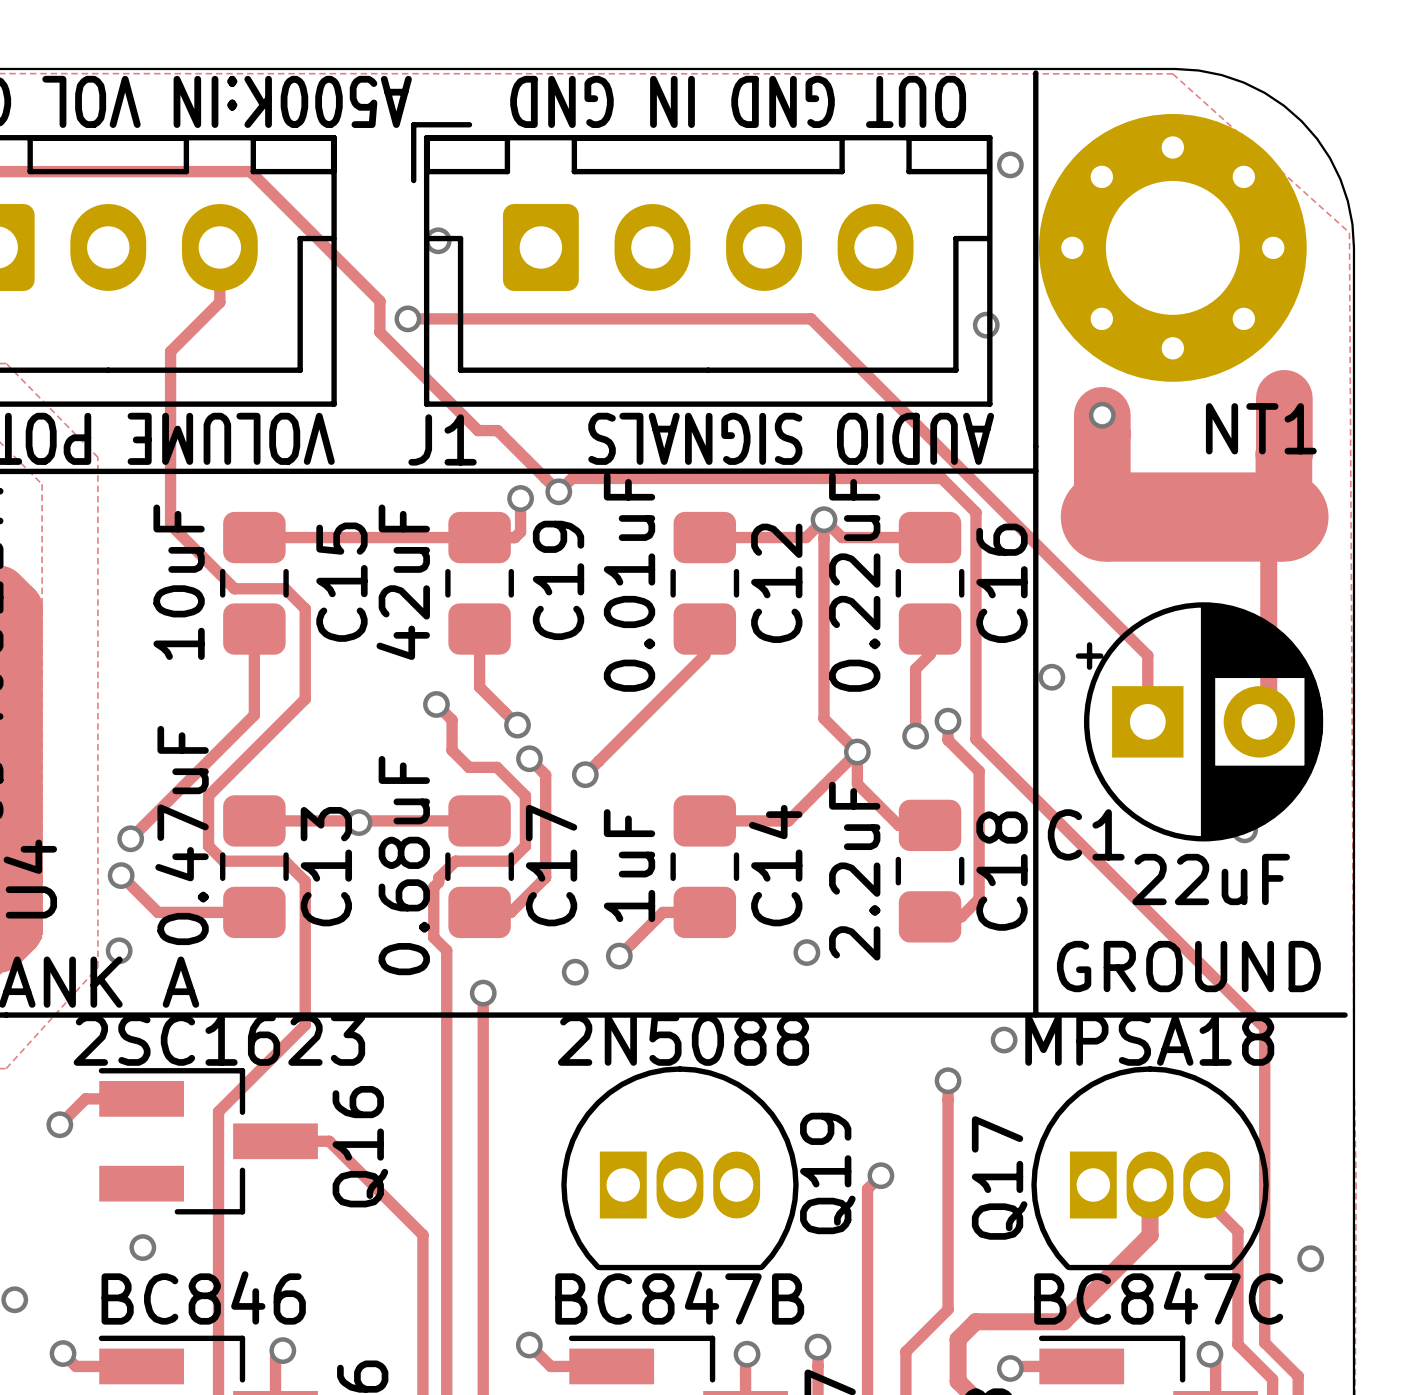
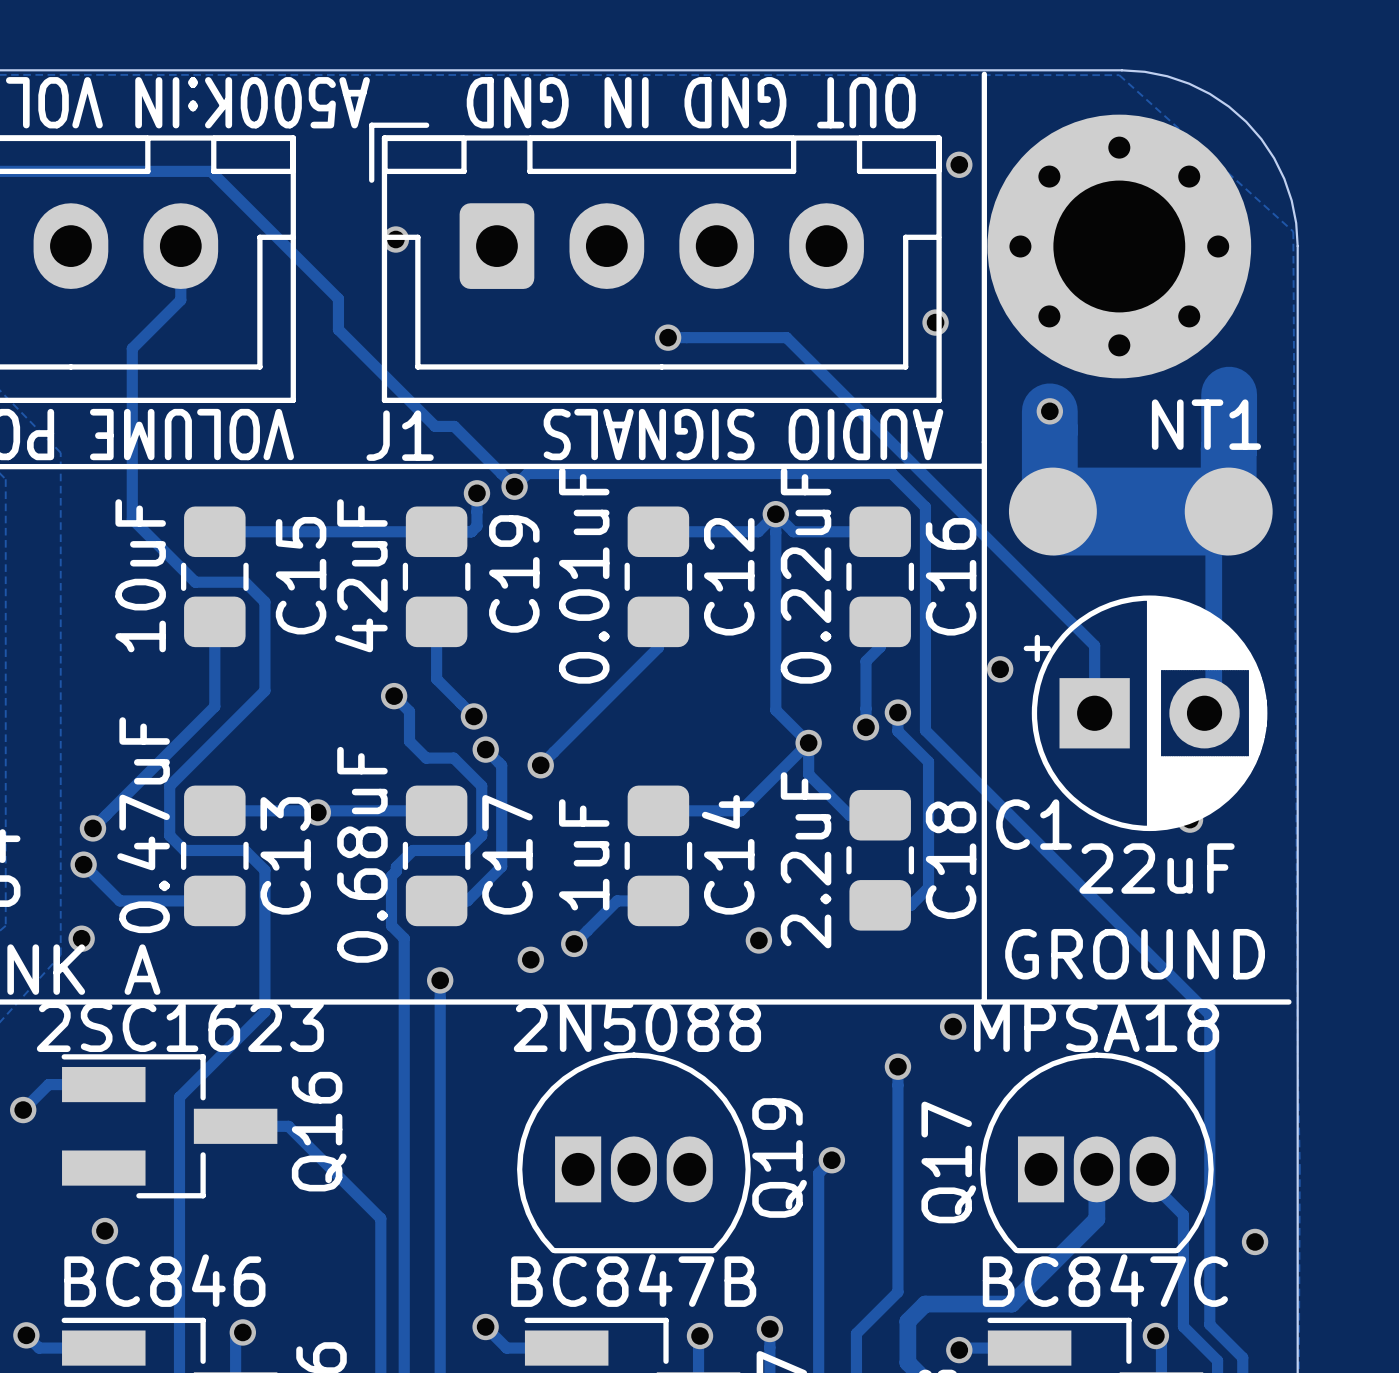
track: (407, 318) (811, 318) (1147, 655) -> (668, 337) (786, 337) (1094, 645) (1094, 648)
via: (407, 318) -> none
via: none -> (668, 337)

